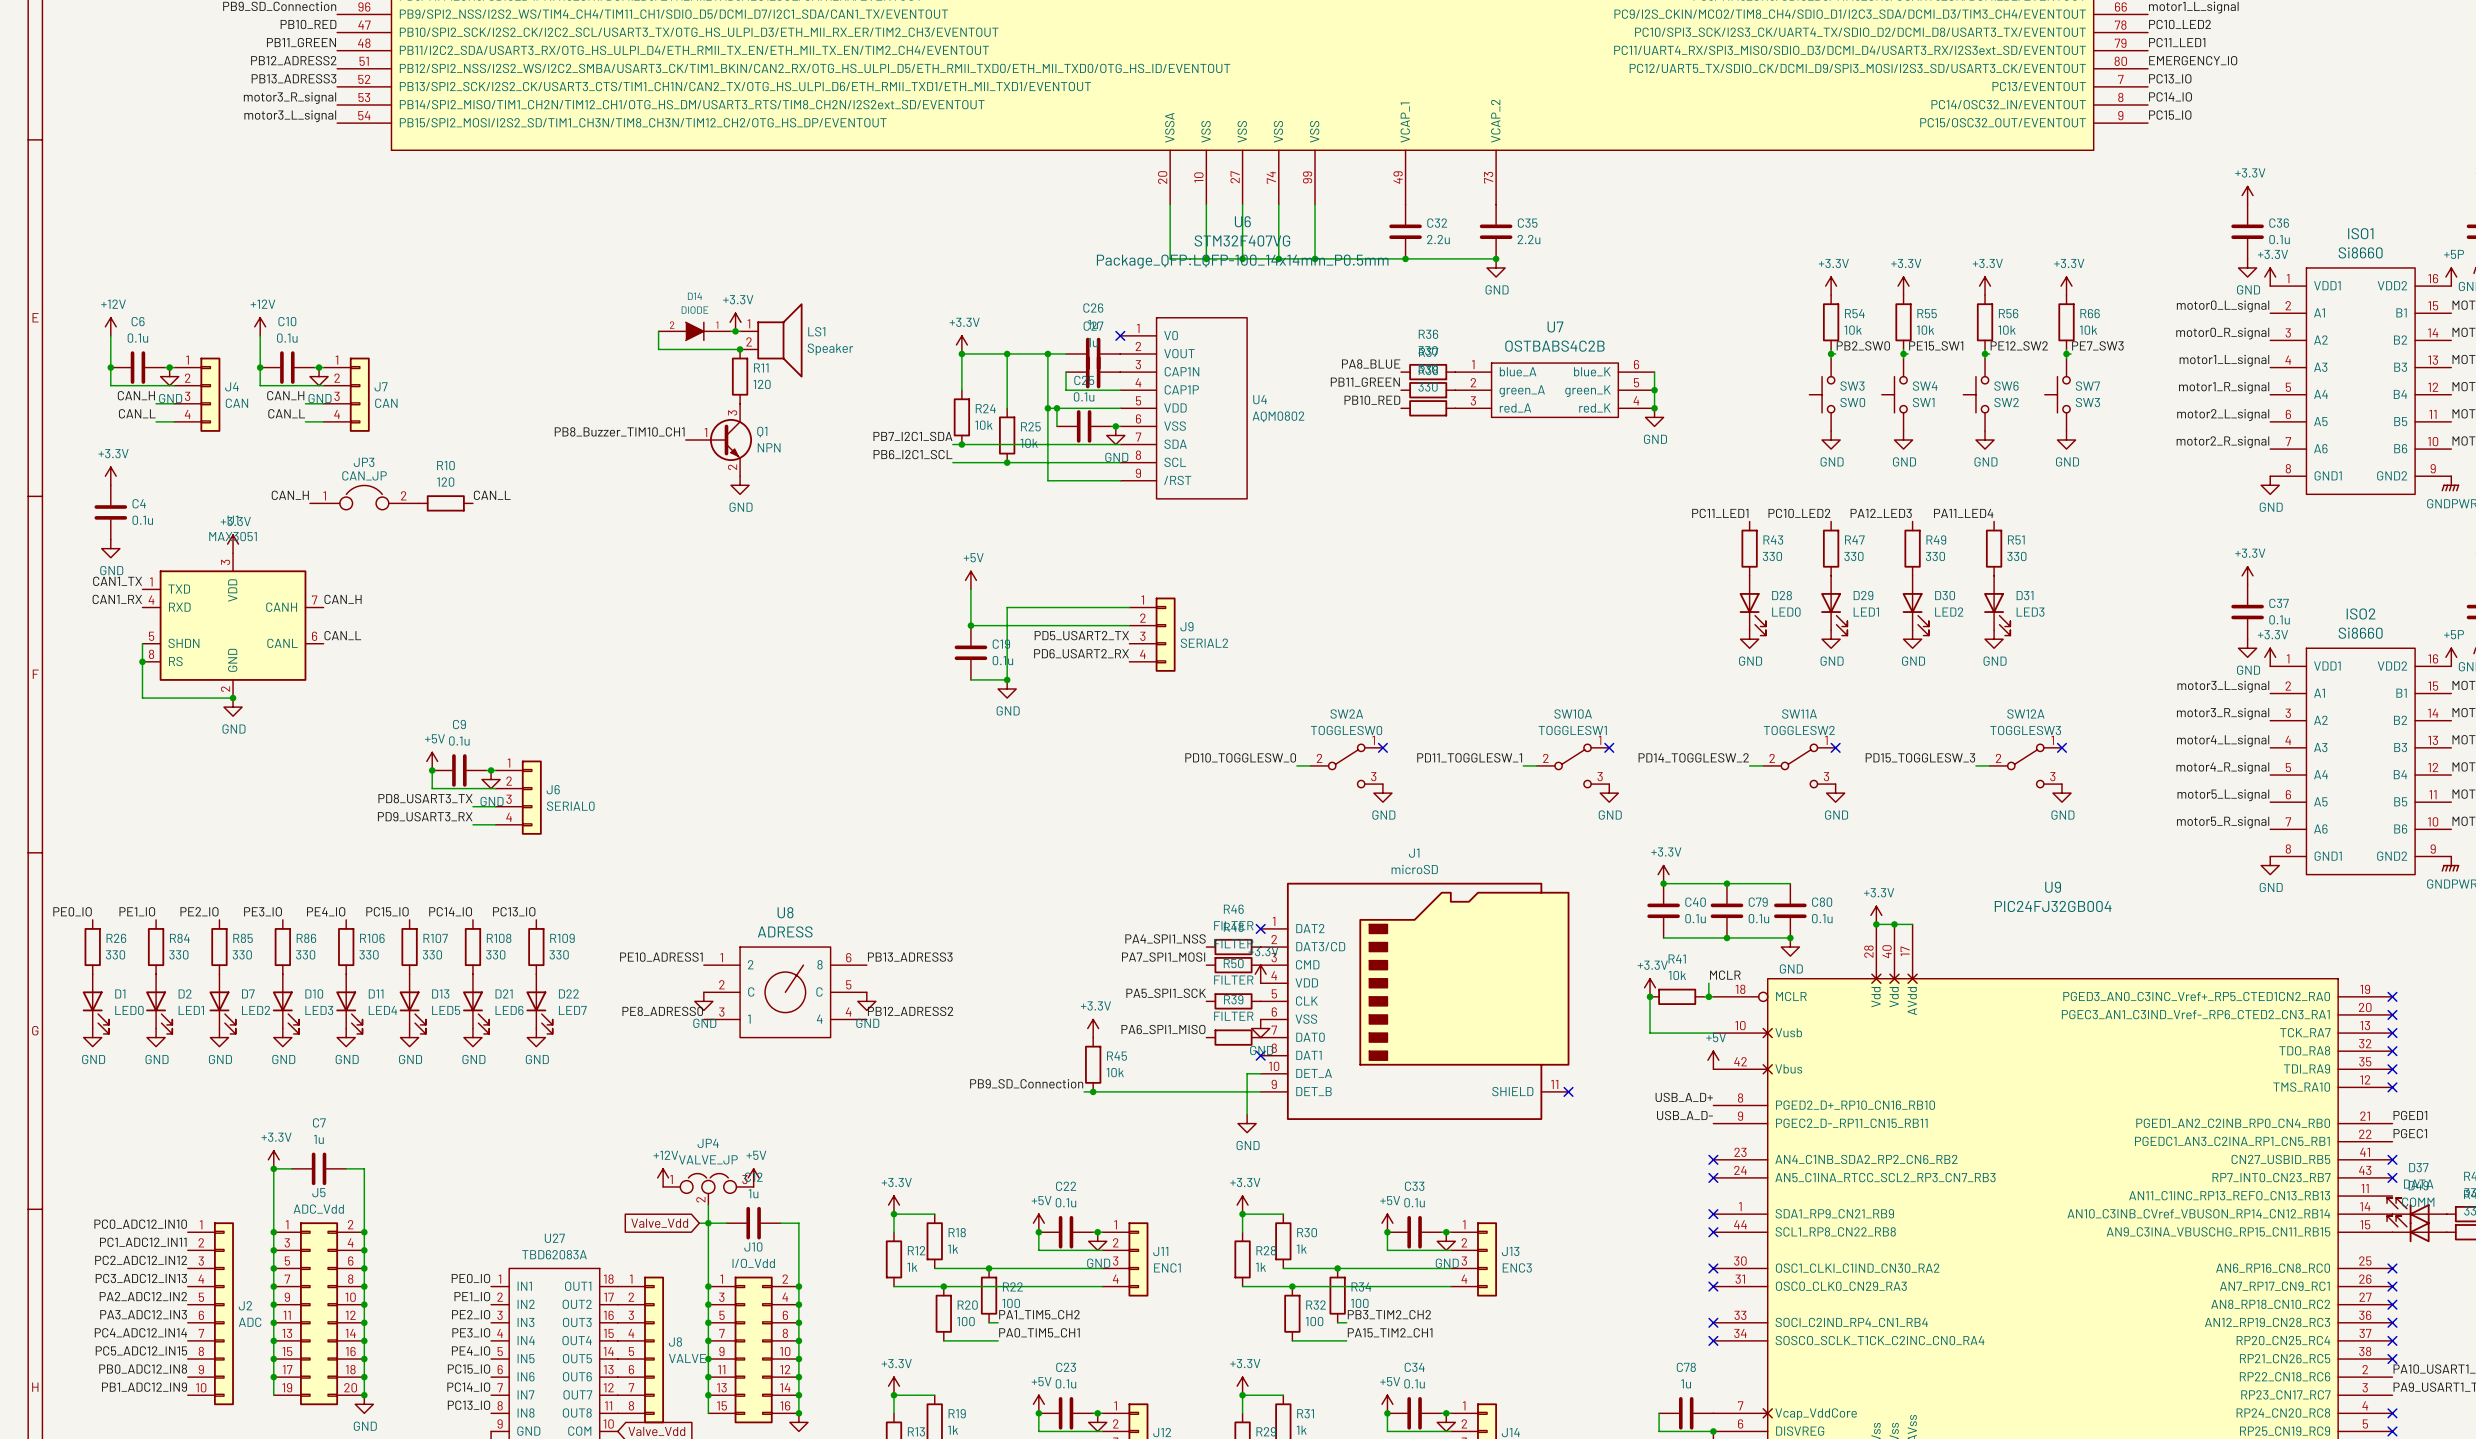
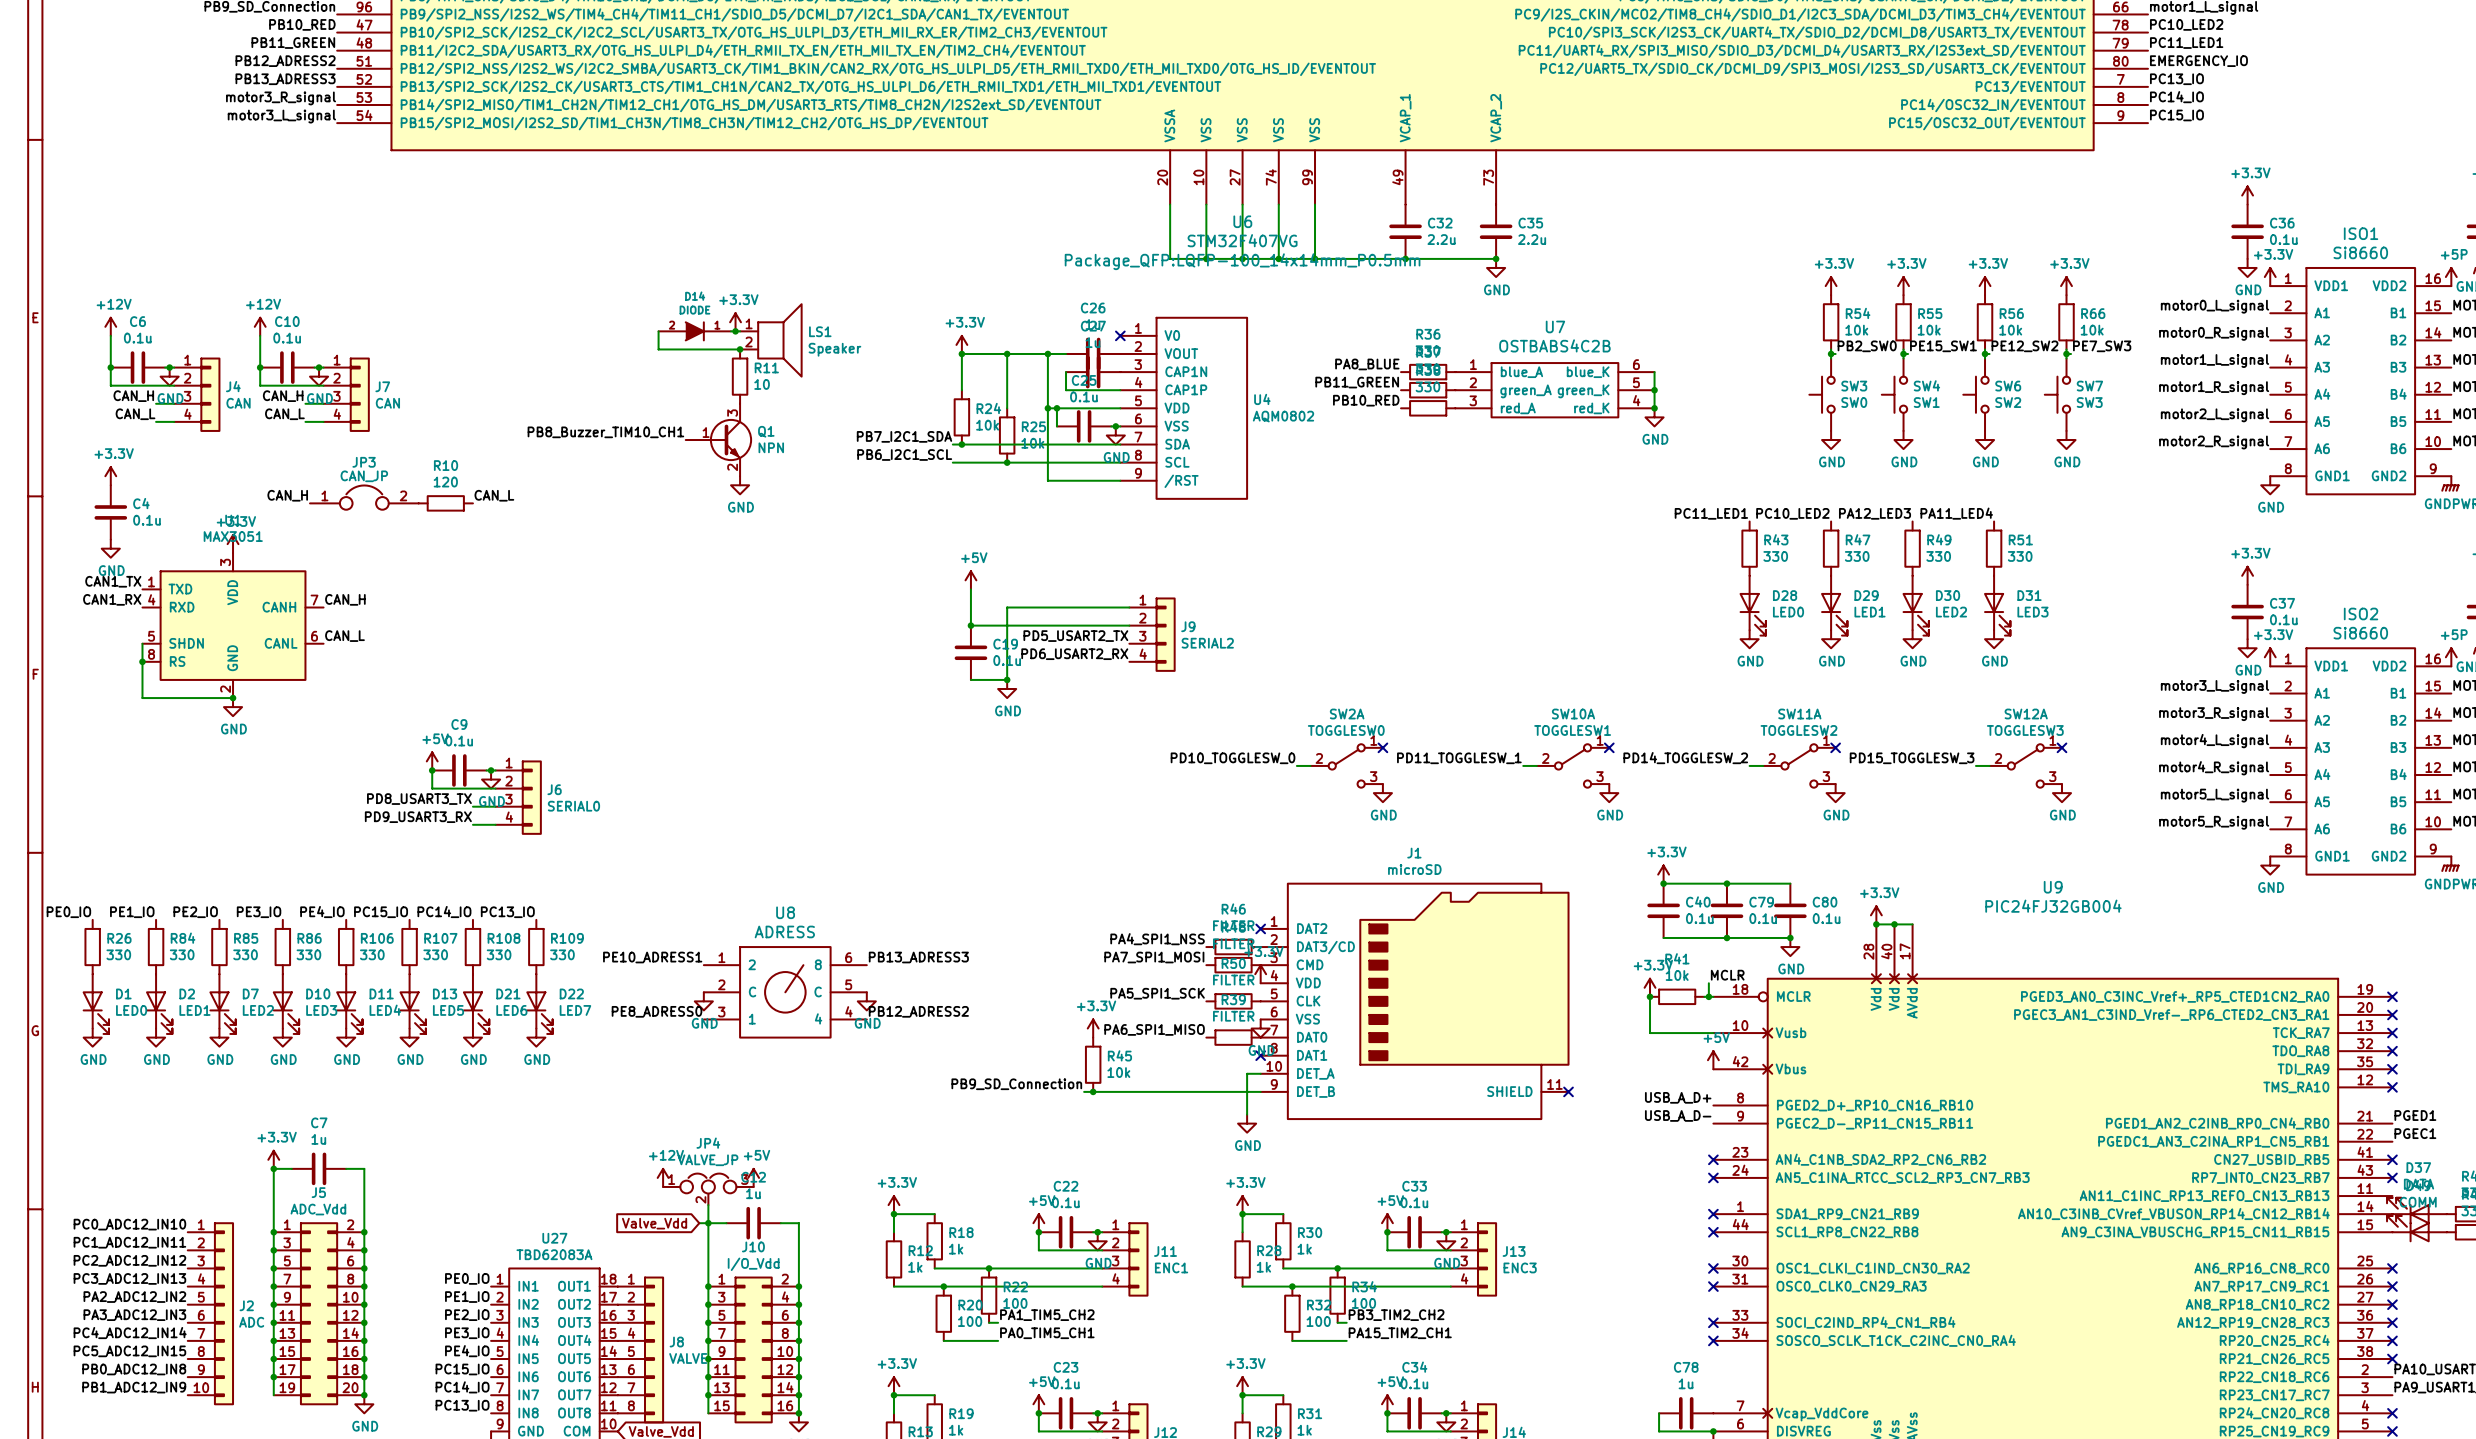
R11 value: 120 (762, 384) -> 10 (762, 384)

